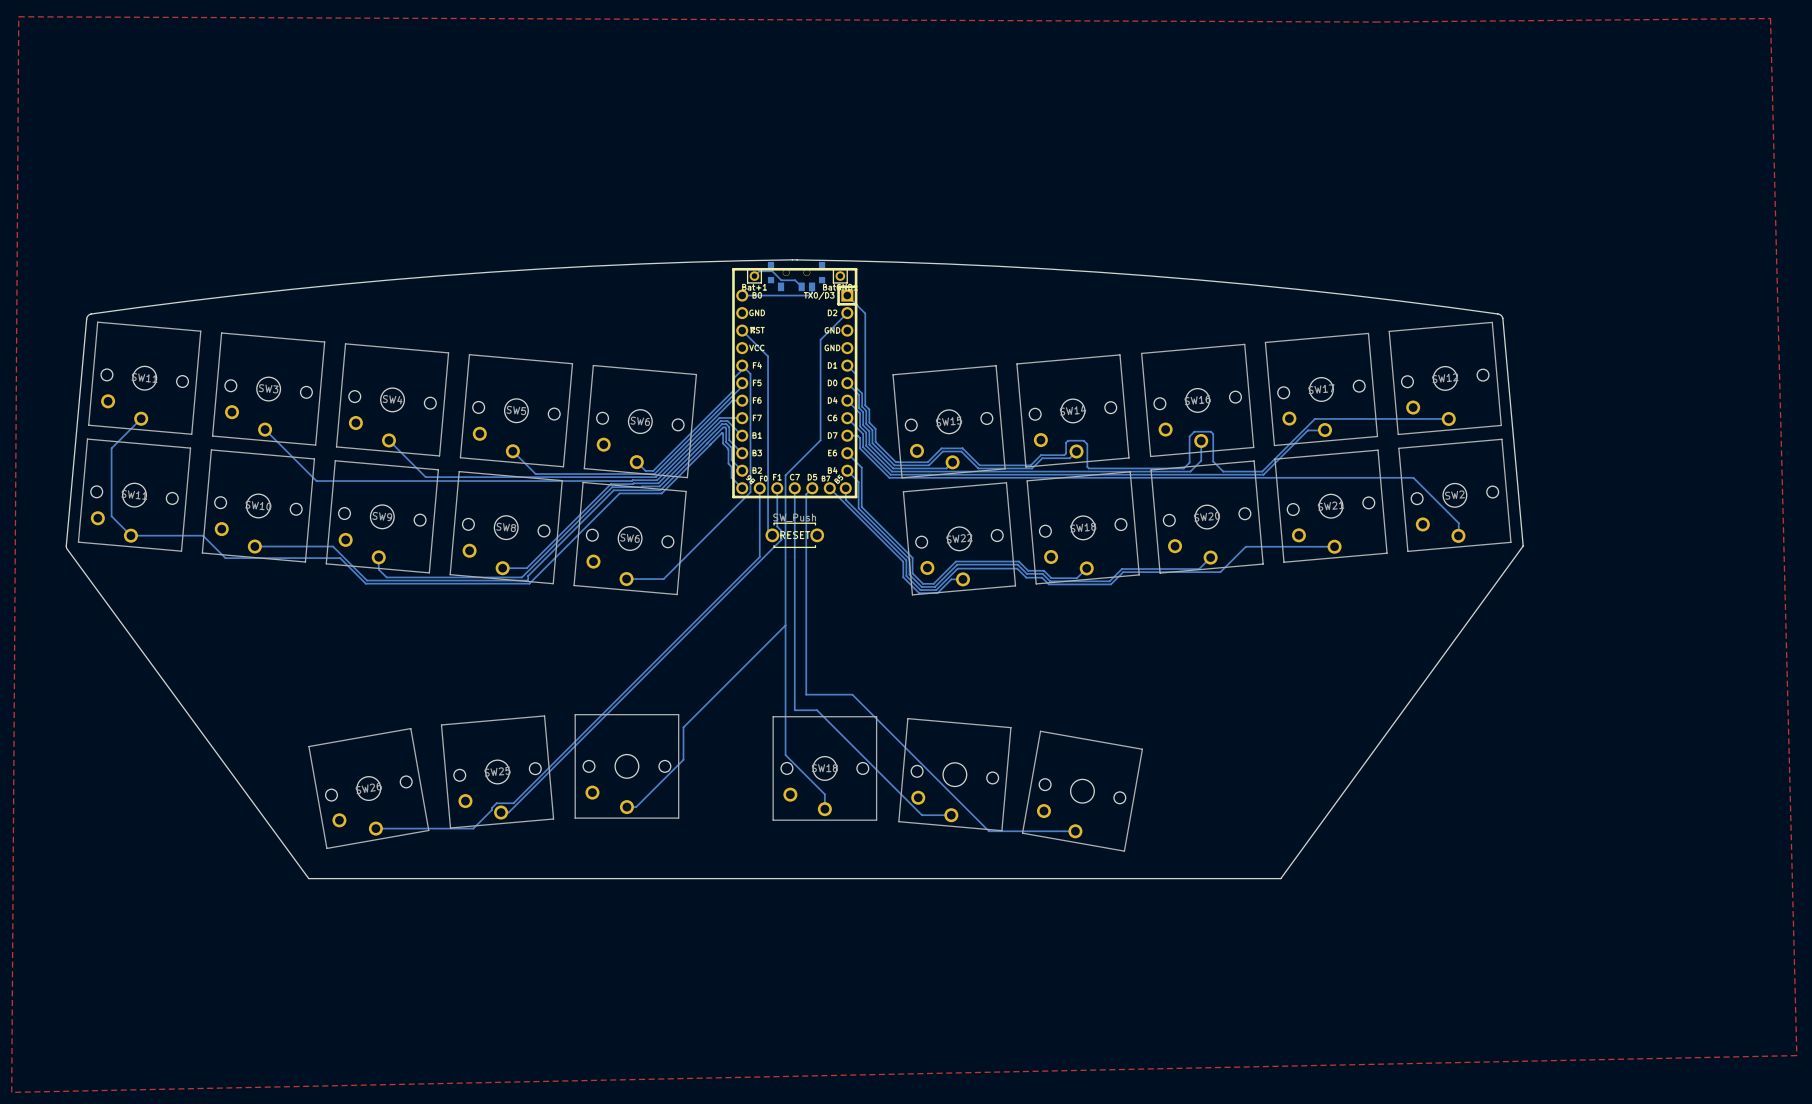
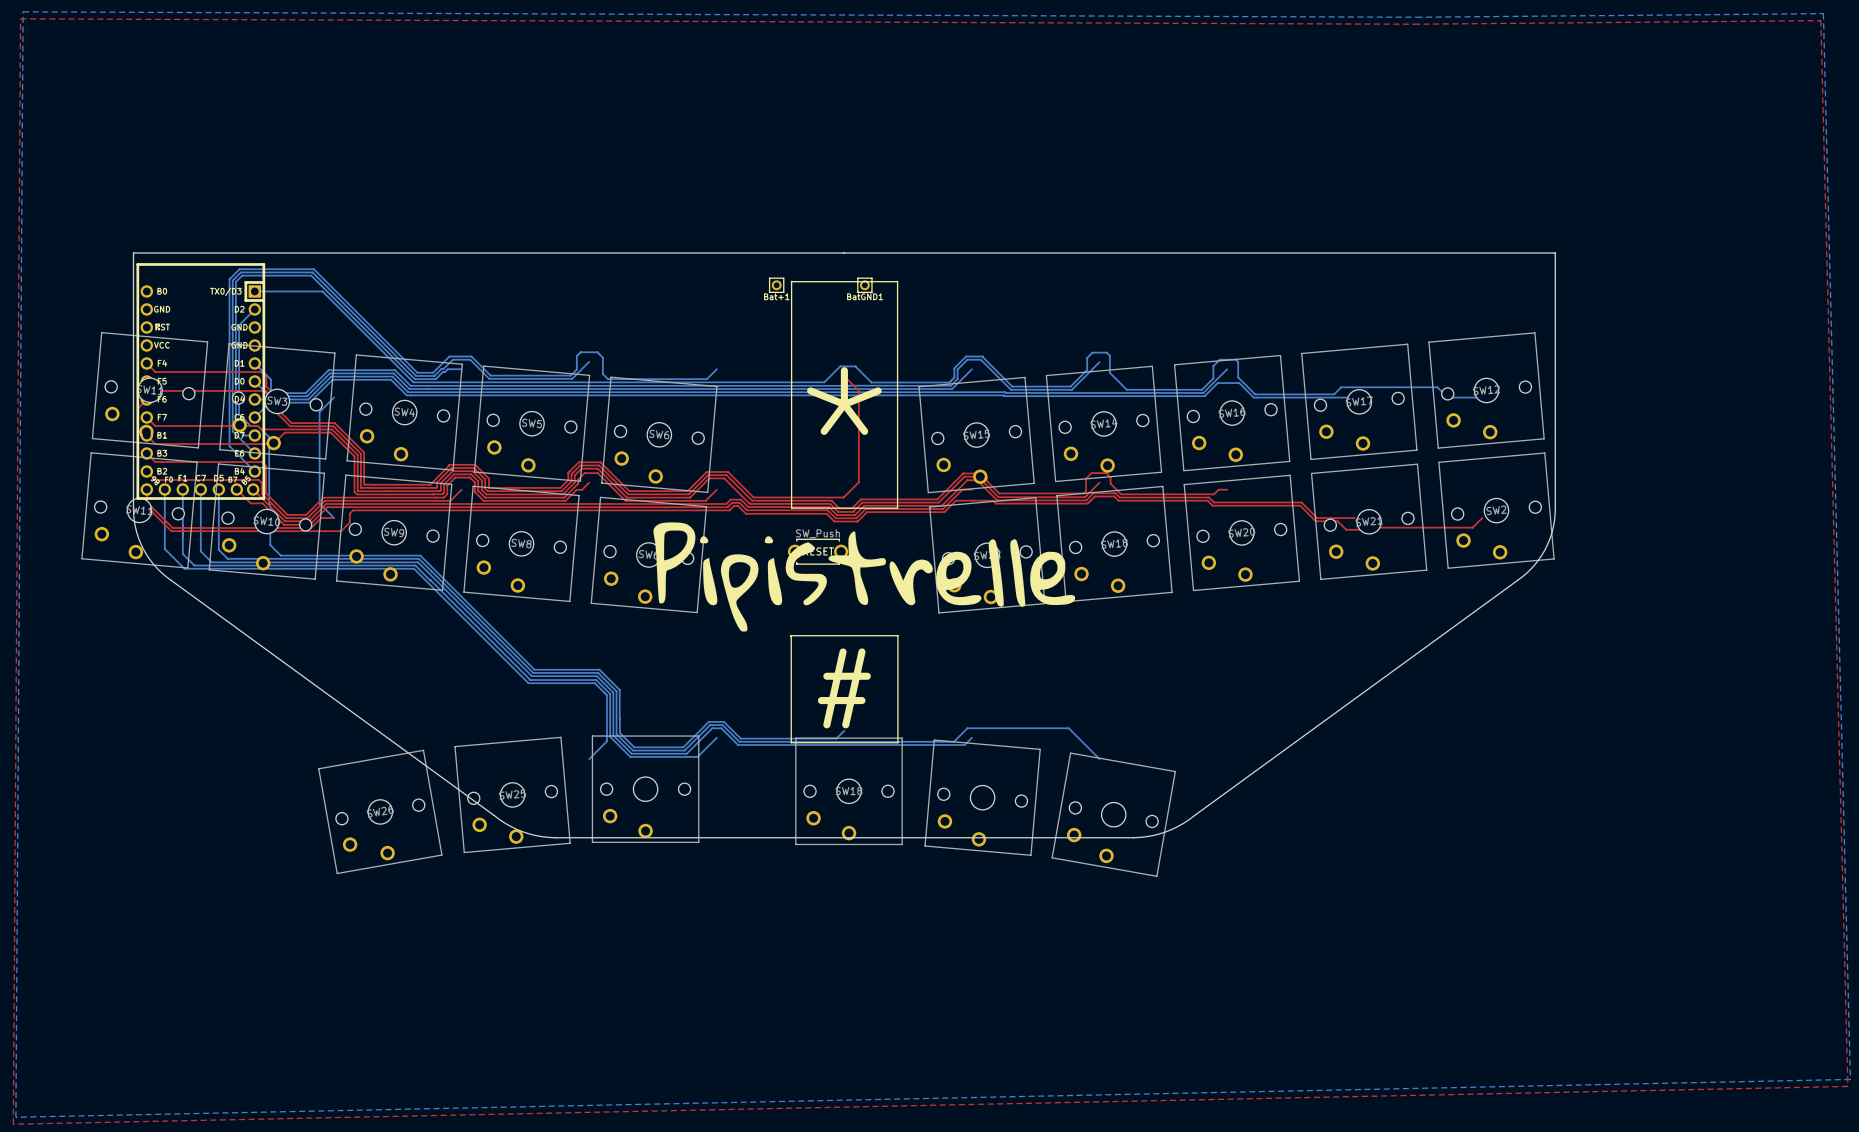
bottom zone outline: none -> (23, 11) (15, 1117) (1850, 1079) (1823, 13) (1416, 17) (23, 11)
board edge: (792, 259) (947, 264) (1148, 275) (1348, 294) (1498, 314) (1501, 316) (1523, 546) (1280, 878) (308, 878) (66, 547) (86, 319) (90, 314) (240, 294) (440, 275) (641, 263) (792, 259) -> (133, 252) (133, 515) (138, 538) (149, 559) (166, 576) (499, 819) (516, 829) (535, 835) (555, 837) (1133, 837) (1159, 833) (1189, 819) (1522, 576) (1542, 554) (1553, 526) (1555, 509) (1555, 252) (133, 252)
line: none -> (791, 281) (791, 508) (897, 508) (897, 281) (791, 281)
bottom track: (754, 276) (759, 271) (772, 271) (781, 280) (795, 280) (801, 286) -> none
part: (796, 276) -> none
bottom track: none -> (254, 291) (322, 291) (413, 382) (824, 382) (840, 366) (855, 366) (871, 382) (949, 382) (954, 377) (954, 368) (966, 356) (983, 356) (1012, 386) (1070, 386) (1087, 369) (1087, 357) (1092, 352)
bottom track: (812, 286) (812, 292) (809, 295) (742, 295) -> none
bottom track: (847, 295) (865, 313) (865, 405) (869, 409) (869, 422) (875, 428) (875, 441) (895, 462) (898, 462) -> none
bottom track: none -> (254, 309) (239, 325) (239, 414) (250, 426) (257, 426) (269, 437) (270, 545) (280, 555) (420, 555) (534, 669) (599, 669) (619, 689) (619, 732) (634, 747) (683, 747) (708, 721) (724, 721) (740, 738) (836, 738) (844, 730)
bottom track: (847, 313) (820, 339) (820, 440) (785, 475) (785, 755) (824, 794) (824, 809) -> none
bottom track: (742, 330) (768, 356) (768, 530) (772, 535) -> none
bottom track: none -> (580, 352) (597, 352) (602, 357) (602, 374) (608, 379) (706, 379) (716, 369)
bottom track: none -> (580, 352) (576, 356) (576, 369) (570, 375) (490, 375) (471, 356) (449, 356) (433, 372) (417, 372) (313, 269) (239, 269) (229, 279) (229, 446) (254, 471)
bottom track: none -> (1092, 352) (1106, 352) (1109, 355) (1109, 372) (1126, 389) (1201, 389) (1213, 378) (1213, 366) (1219, 359) (1235, 359) (1238, 361) (1238, 377) (1255, 394) (1334, 394) (1341, 387) (1437, 387) (1447, 397) (1482, 397)
bottom track: none -> (589, 361) (572, 378) (489, 378) (470, 359) (452, 359) (434, 375) (416, 375) (312, 272) (240, 272) (232, 280) (232, 431) (254, 453)
bottom track: none -> (1099, 362) (1071, 389) (1010, 389) (980, 359) (967, 359) (957, 369) (957, 379) (950, 385) (410, 385) (395, 370) (328, 370) (305, 393) (273, 393) (270, 390) (270, 379) (254, 363)
top track: none -> (146, 363) (155, 372) (261, 372) (266, 377) (266, 386) (274, 394) (274, 405) (291, 423) (334, 423) (364, 452) (364, 484) (430, 484) (448, 464) (475, 464) (489, 478) (489, 487) (560, 487) (568, 480) (568, 472)
bottom track: none -> (461, 369) (447, 369) (435, 379) (414, 379) (311, 275) (242, 275) (235, 281) (235, 427) (243, 435) (254, 435)
bottom track: none -> (971, 369) (952, 389) (409, 389) (393, 373) (329, 373) (307, 396) (269, 396) (254, 381)
bottom track: none -> (1227, 369) (1203, 392) (408, 392) (392, 376) (331, 376) (308, 399) (254, 399)
top track: none -> (844, 376) (858, 390) (858, 482) (843, 497) (753, 497) (728, 472) (706, 472) (687, 491) (629, 491) (600, 462) (578, 462) (568, 472)
bottom track: (847, 365) (855, 373) (855, 387) (862, 393) (862, 406) (866, 410) (866, 423) (872, 430) (872, 443) (894, 465) (928, 465) (942, 451) (961, 451) (978, 468) (1032, 468) (1042, 458) (1069, 458) (1076, 451) -> none
top track: none -> (146, 381) (156, 390) (266, 390) (271, 395) (271, 407) (290, 426) (333, 426) (360, 453) (360, 487)
part: none -> (200, 381)
bottom track: (742, 383) (742, 386) (654, 474) (535, 474) (512, 451) -> none
part: (794, 383) -> none
bottom track: (847, 383) (859, 394) (859, 407) (863, 412) (863, 425) (869, 431) (869, 444) (893, 468) (946, 468) (952, 462) -> none
bottom track: none -> (334, 397) (319, 412) (319, 503) (334, 518)
bottom track: none -> (1354, 397) (1253, 397) (1239, 383) (1217, 383) (1204, 396) (406, 395) (391, 379) (332, 379) (309, 402) (269, 402) (254, 417)
top track: none -> (146, 399) (138, 408) (138, 498) (171, 531) (341, 531) (349, 522) (349, 513) (353, 510) (729, 510) (733, 506) (738, 506) (746, 513) (826, 513) (834, 521) (857, 521) (867, 512) (944, 512) (955, 500) (992, 500) (995, 503) (1087, 503) (1094, 496) (1114, 496) (1118, 500) (1207, 500) (1212, 505) (1300, 505) (1314, 519)
text: none -> * (844, 401)
bottom track: (742, 400) (732, 400) (655, 477) (425, 477) (388, 440) -> none
bottom track: (847, 400) (860, 413) (860, 426) (866, 432) (866, 445) (892, 471) (1190, 471) (1201, 460) (1201, 440) -> none
top track: none -> (146, 417) (155, 426) (257, 426) (261, 429) (332, 429) (357, 455) (358, 491) (440, 491) (440, 483) (452, 471) (472, 471) (481, 480) (481, 489) (486, 494) (563, 494) (574, 482) (574, 475) (581, 468) (597, 468) (626, 497) (689, 497) (709, 478) (724, 478) (749, 503) (830, 503) (838, 511) (853, 511) (862, 502) (938, 502) (964, 476) (981, 476) (983, 482) (998, 497) (1084, 497) (1099, 482)
bottom track: (141, 418) (111, 448) (111, 516) (130, 535) (203, 535) (225, 558) (340, 558) (365, 583) (529, 583) (619, 493) (661, 493) (721, 433) (723, 443) (728, 449) (728, 463) (731, 466) (731, 477) (742, 488) -> none
bottom track: (742, 418) (719, 417) (657, 480) (631, 481) (316, 481) (265, 429) -> none
bottom track: (847, 418) (863, 434) (863, 447) (890, 474) (1263, 474) (1307, 430) (1325, 430) -> none
bottom track: (1448, 418) (1314, 418) (1262, 471) (1223, 471) (1213, 461) (1213, 433) (1210, 431) (1194, 431) (1189, 436) (1189, 462) (1183, 468) (1088, 468) (1087, 444) (1083, 440) (1068, 440) (1064, 455) (1041, 455) (1030, 465) (979, 465) (962, 448) -> none
top track: none -> (146, 435) (155, 444) (273, 444) (284, 432) (330, 432) (354, 456) (354, 491) (356, 494) (442, 494)
bottom track: (742, 435) (727, 421) (720, 421) (658, 483) (610, 484) (526, 568) (502, 568) -> none
bottom track: (847, 435) (857, 435) (860, 438) (860, 448) (889, 477) (1413, 477) (1458, 523) (1458, 537) -> none
top track: none -> (146, 453) (155, 462) (261, 462) (265, 466) (265, 493) (287, 514) (306, 514) (323, 497) (443, 497) (447, 494) (447, 485) (455, 477) (469, 477) (474, 482) (474, 492) (483, 500) (565, 500) (576, 489) (582, 489) (589, 482)
bottom track: (962, 448) (941, 448) (927, 462) (898, 462) -> none
bottom track: (742, 453) (729, 440) (729, 427) (726, 424) (722, 424) (659, 486) (612, 487) (521, 577) (386, 577) (378, 569) (378, 557) -> none
bottom track: (847, 453) (861, 467) (861, 506) (912, 557) (912, 573) (923, 583) (933, 583) (956, 561) (1018, 561) (1028, 570) (1043, 570) (1051, 578) (1076, 578) (1086, 568) -> none
top track: none -> (146, 471) (155, 480) (258, 480) (262, 482) (262, 493) (286, 518) (307, 518) (324, 500) (450, 500) (461, 489)
top track: none -> (572, 473) (571, 481) (561, 491) (487, 491) (485, 488) (485, 479) (473, 467) (451, 467) (437, 482) (436, 487) (360, 487)
top track: none -> (963, 473) (937, 499) (860, 499) (851, 508) (839, 508) (831, 500) (752, 500) (726, 475) (708, 475) (688, 494) (628, 494) (599, 465) (580, 465) (572, 473)
top track: none -> (963, 473) (982, 473) (986, 477) (986, 481) (999, 493) (1083, 493) (1085, 491) (1085, 478) (1091, 473) (1106, 473) (1110, 476) (1110, 483) (1121, 494) (1214, 494) (1218, 489) (1227, 489)
bottom track: (636, 462) (645, 470) (653, 470) (733, 390) (733, 378) (742, 369) (742, 365) (750, 373) (750, 492) (663, 579) (626, 579) -> none
bottom track: (742, 470) (731, 460) (731, 447) (726, 442) (726, 428) (723, 427) (660, 490) (613, 490) (528, 575) (528, 580) (367, 580) (332, 546) (254, 546) -> none
bottom track: (847, 470) (858, 482) (858, 508) (909, 559) (909, 574) (921, 586) (934, 586) (957, 564) (1017, 564) (1026, 573) (1042, 573) (1050, 581) (1109, 581) (1121, 569) (1199, 569) (1210, 557) -> none
top track: none -> (146, 489) (146, 502) (172, 527) (311, 527) (321, 518) (334, 518)
bottom track: none -> (164, 489) (164, 549) (184, 568) (414, 568) (528, 683) (594, 683) (606, 695) (606, 741) (589, 759)
bottom track: none -> (182, 489) (182, 553) (194, 565) (415, 565) (530, 680)
bottom track: none -> (200, 489) (200, 551) (211, 562) (418, 562) (531, 676) (596, 676) (613, 692) (613, 735) (631, 753) (686, 753) (712, 728) (721, 728) (738, 744) (964, 744) (971, 737)
bottom track: none -> (218, 489) (218, 549) (227, 558) (419, 558) (431, 571)
top track: none -> (236, 489) (250, 503) (262, 503) (284, 524) (309, 524) (327, 507) (728, 507) (731, 502) (739, 502) (746, 509)
top track: none -> (253, 489) (284, 521) (308, 521) (326, 504) (726, 504) (730, 499) (741, 499) (748, 507) (829, 507) (837, 515) (855, 515) (864, 505) (941, 505) (967, 480) (979, 480) (997, 500) (1086, 500) (1093, 493) (1115, 493) (1119, 497) (1209, 497) (1214, 502) (1301, 502) (1317, 518) (1354, 518)
top track: none -> (716, 489) (705, 500) (625, 500) (597, 473) (584, 473) (578, 479) (578, 483) (564, 497) (485, 497) (478, 490)
top track: none -> (971, 489) (962, 489) (943, 508) (865, 508) (856, 518) (835, 518) (827, 510) (746, 509)
top track: none -> (478, 490) (478, 481) (471, 474) (454, 474) (444, 484) (442, 494)
bottom track: (759, 488) (759, 557) (513, 803) (496, 803) (473, 828) (375, 828) -> none
bottom track: (777, 488) (777, 526) (781, 530) (781, 539) (508, 812) (501, 812) -> none
bottom track: (794, 488) (794, 710) (817, 710) (921, 815) (951, 815) -> none
bottom track: (812, 488) (806, 494) (806, 694) (852, 694) (989, 831) (1075, 831) -> none
bottom track: (829, 488) (903, 561) (903, 577) (919, 593) (937, 593) (951, 579) (962, 579) -> none
bottom track: (845, 488) (845, 499) (906, 560) (906, 575) (920, 590) (936, 590) (957, 568) (1017, 568) (1026, 577) (1042, 577) (1048, 584) (1110, 584) (1123, 572) (1220, 572) (1245, 546) (1334, 546) -> none
top track: none -> (1482, 518) (1472, 527) (1370, 527) (1368, 529) (1346, 529) (1337, 521) (1314, 519)
drawing: none -> [653, 522, 1076, 632]
bottom track: none -> (431, 571) (533, 672) (598, 672) (616, 691) (616, 734) (632, 750) (684, 750) (710, 725) (722, 725) (739, 741) (953, 741) (967, 728) (1068, 728) (1099, 759)
line: none -> (791, 635) (791, 742) (897, 742) (897, 635) (790, 635) (790, 636)
bottom track: (785, 625) (683, 727) (683, 759) (636, 807) (626, 807) -> none
bottom track: none -> (529, 680) (596, 680) (610, 693) (610, 736) (630, 756) (697, 756) (716, 737)
text: none -> # (844, 688)

